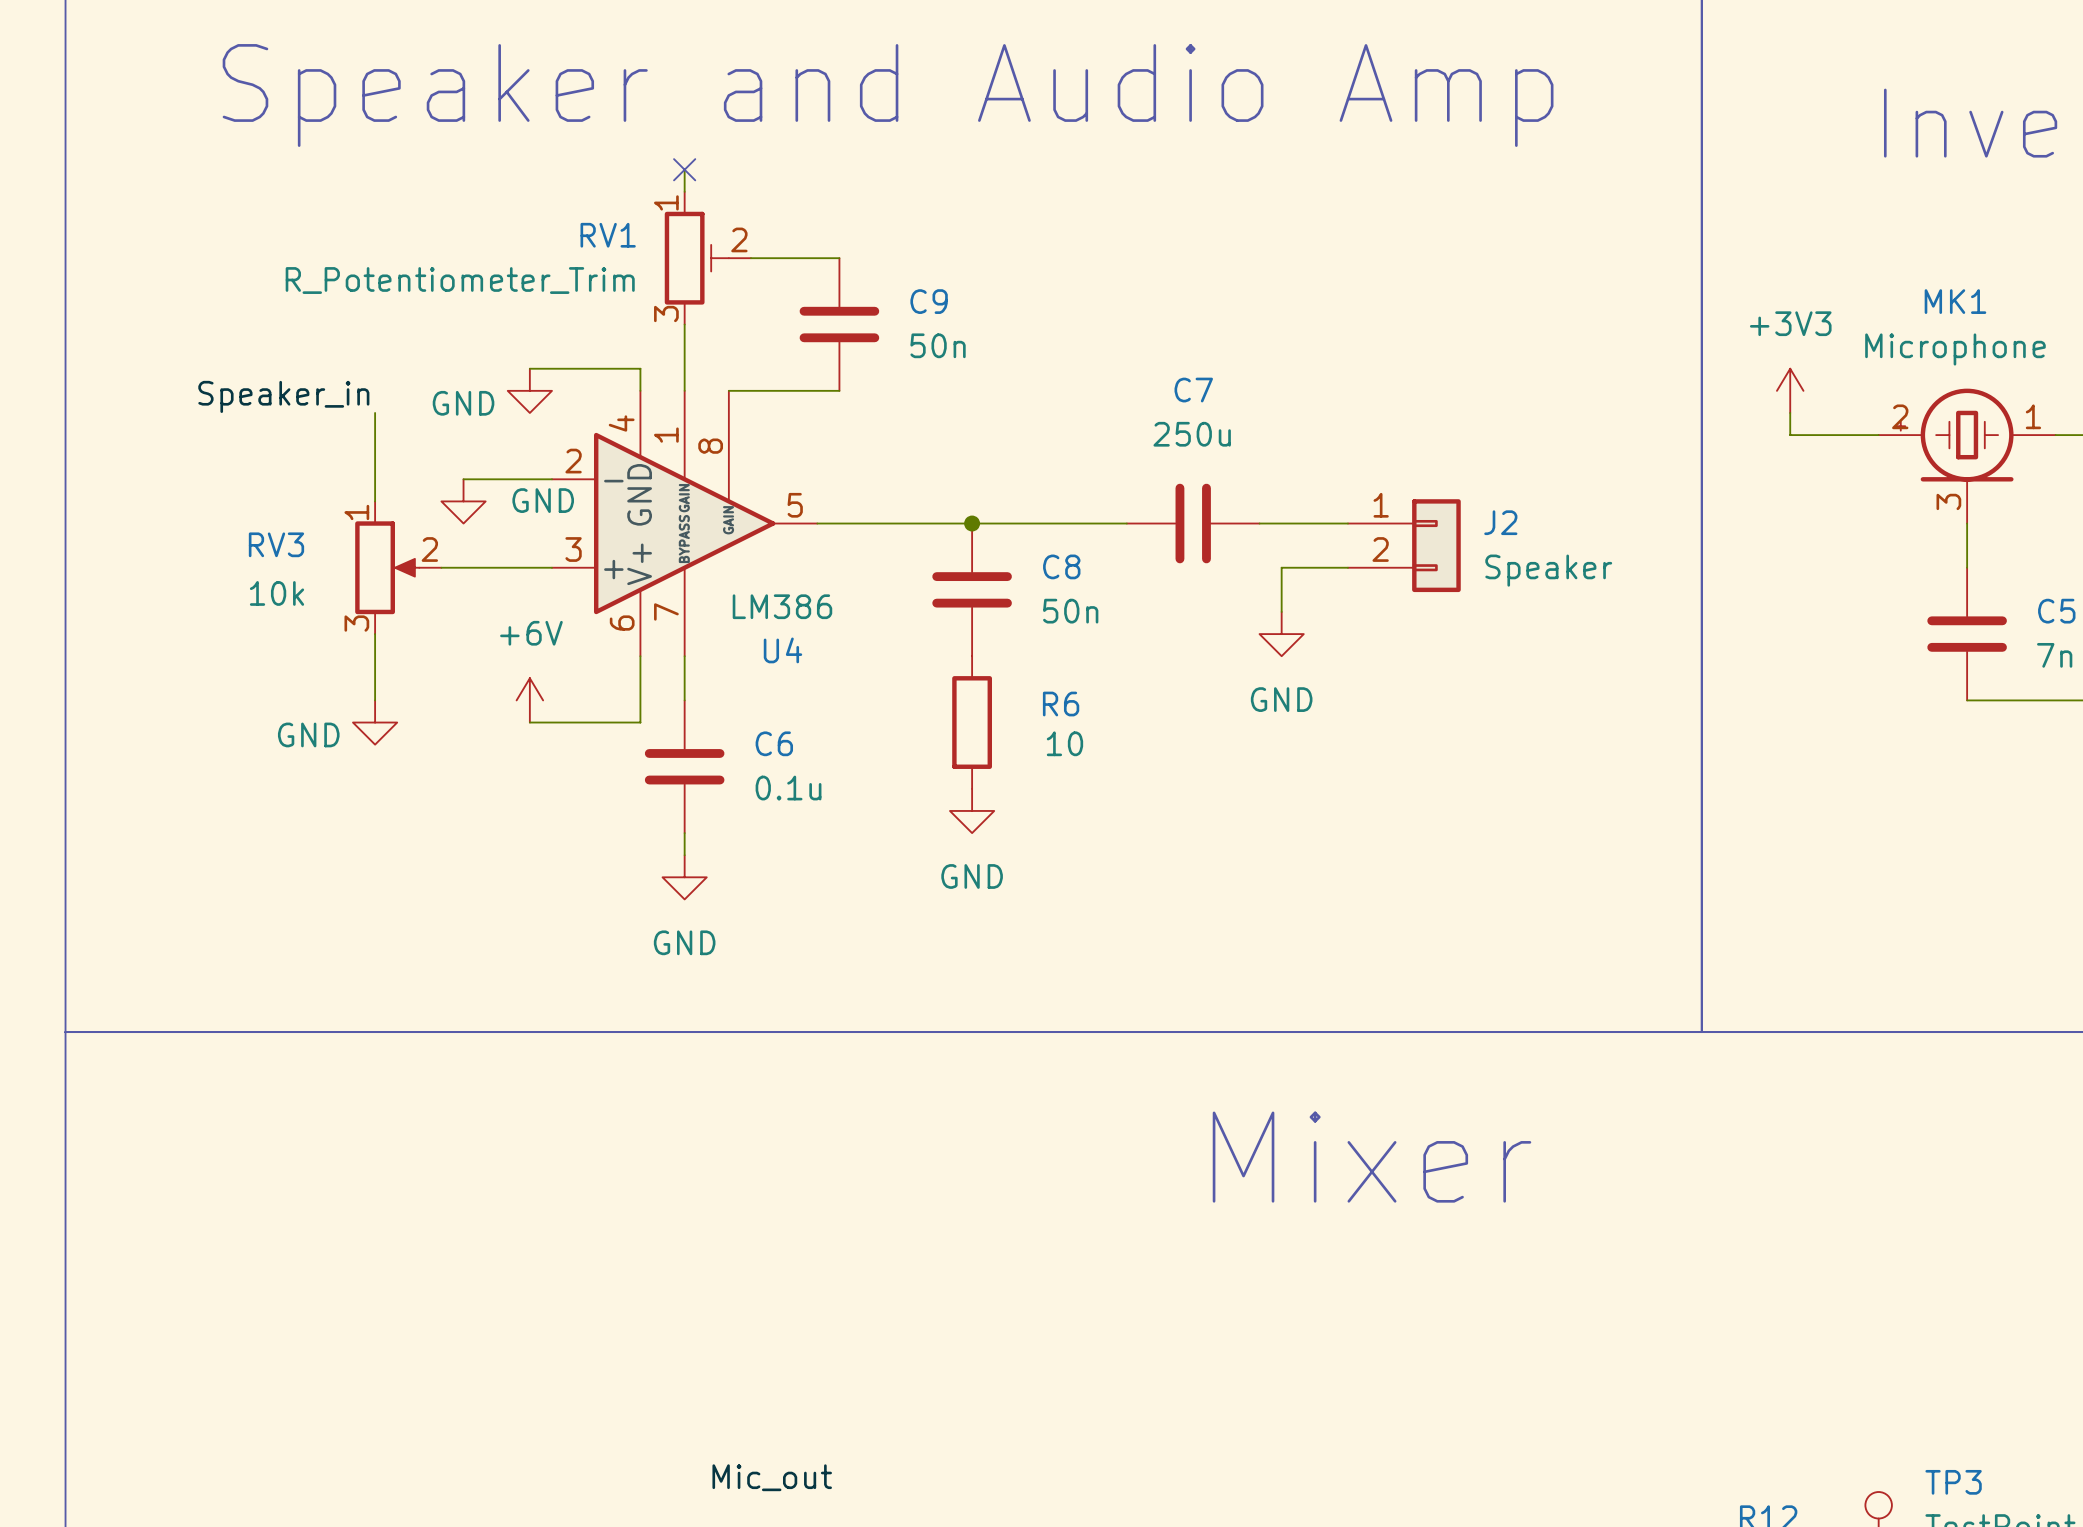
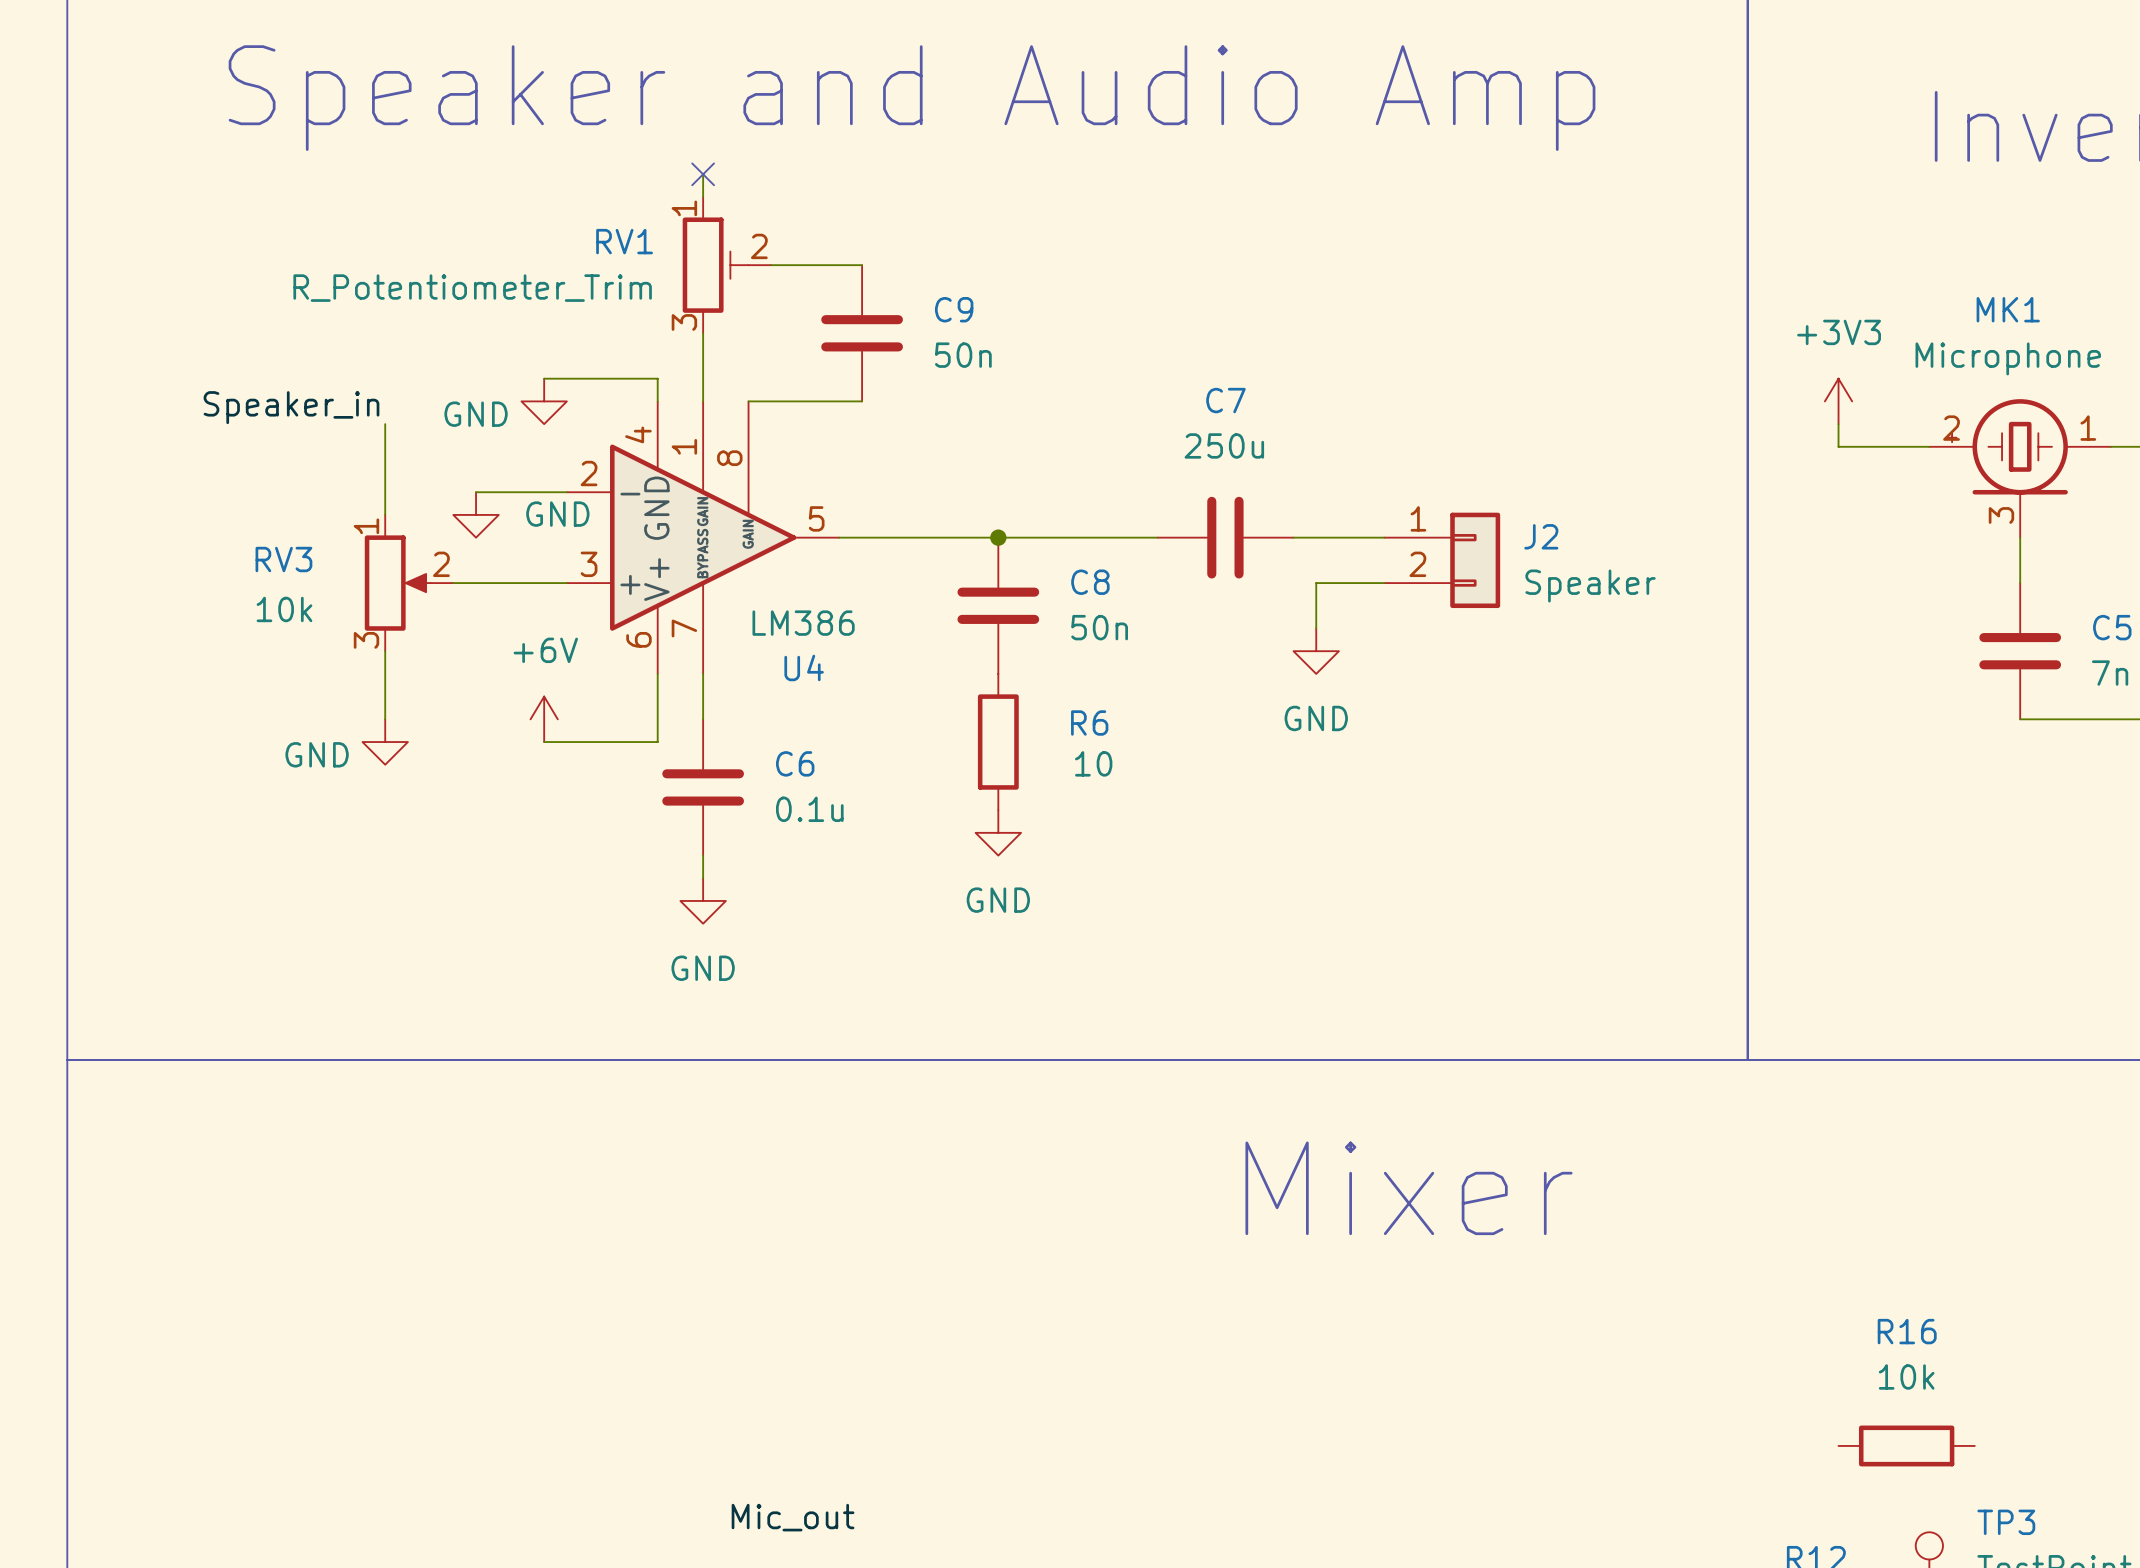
R16: none -> 10k (1906, 1445)

